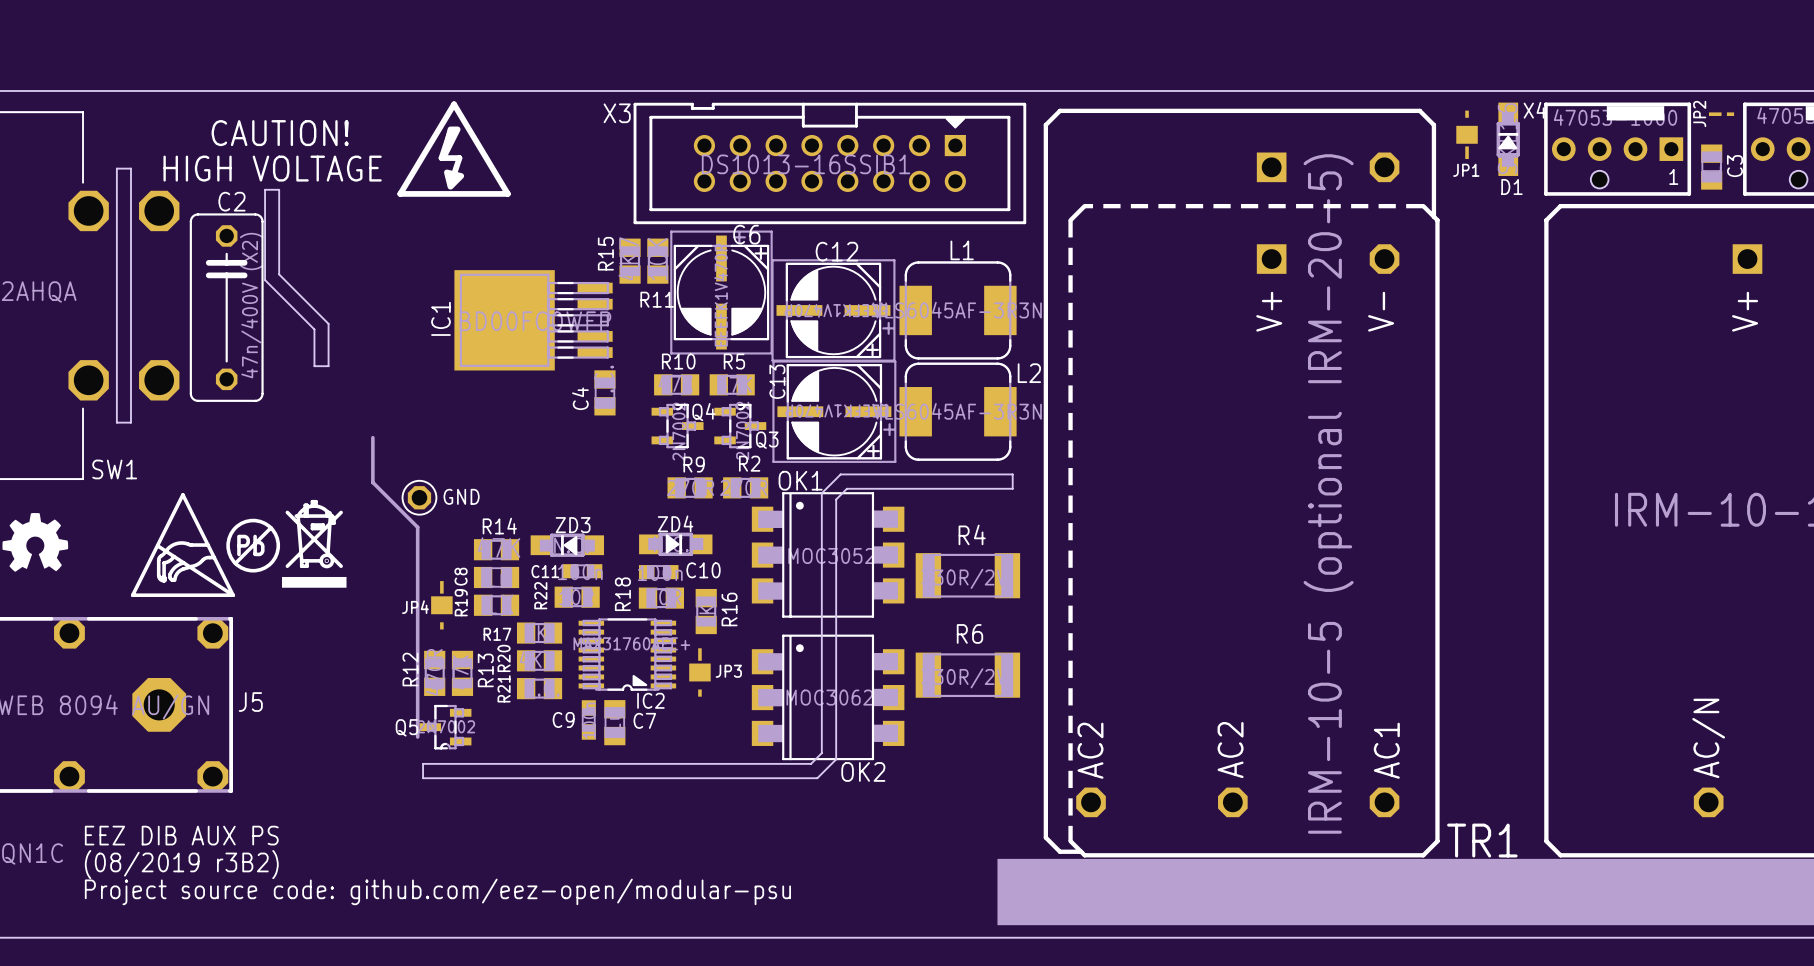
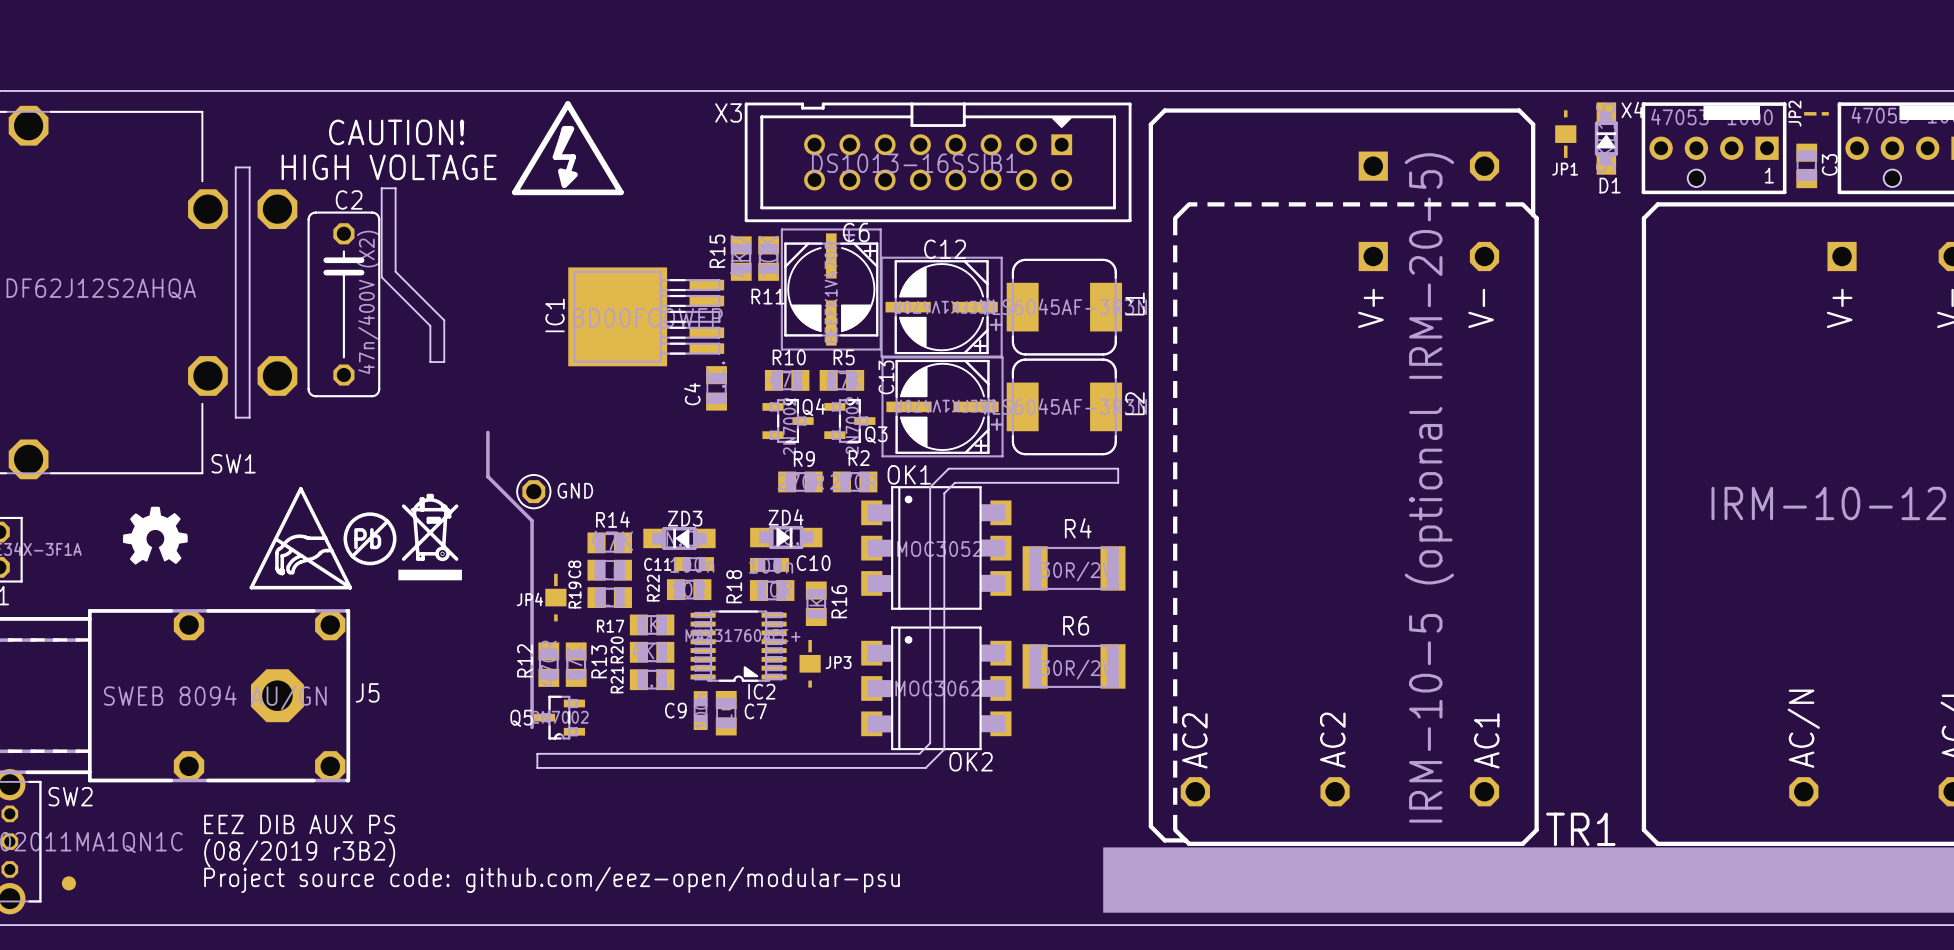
L1 name rotation: 0° (962, 250) -> 90° counterclockwise (1134, 303)
L1 name position: L1 (962, 250) -> L1 (1134, 303)
L2 name rotation: 0° (1029, 373) -> 90° counterclockwise (1134, 403)

